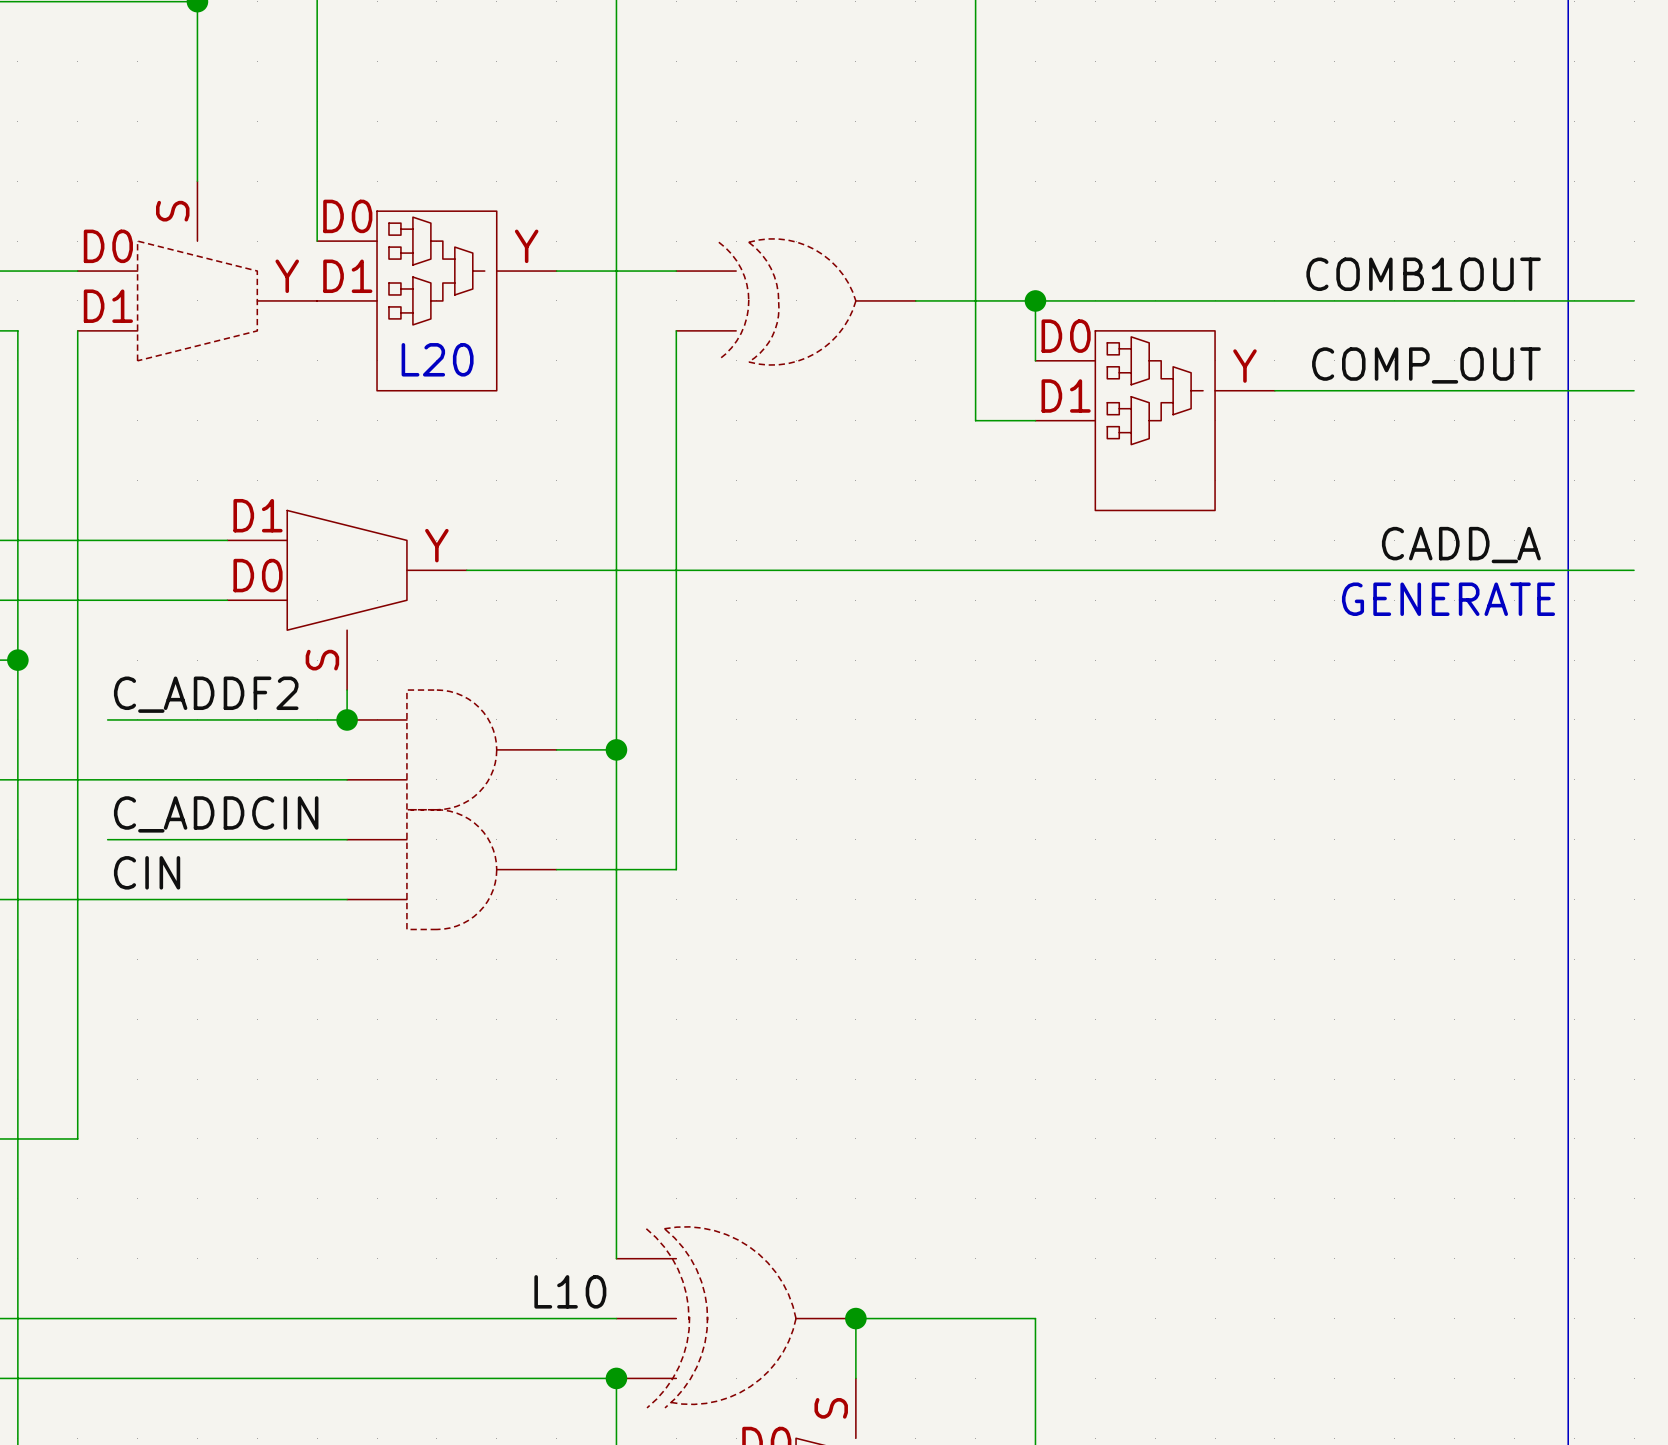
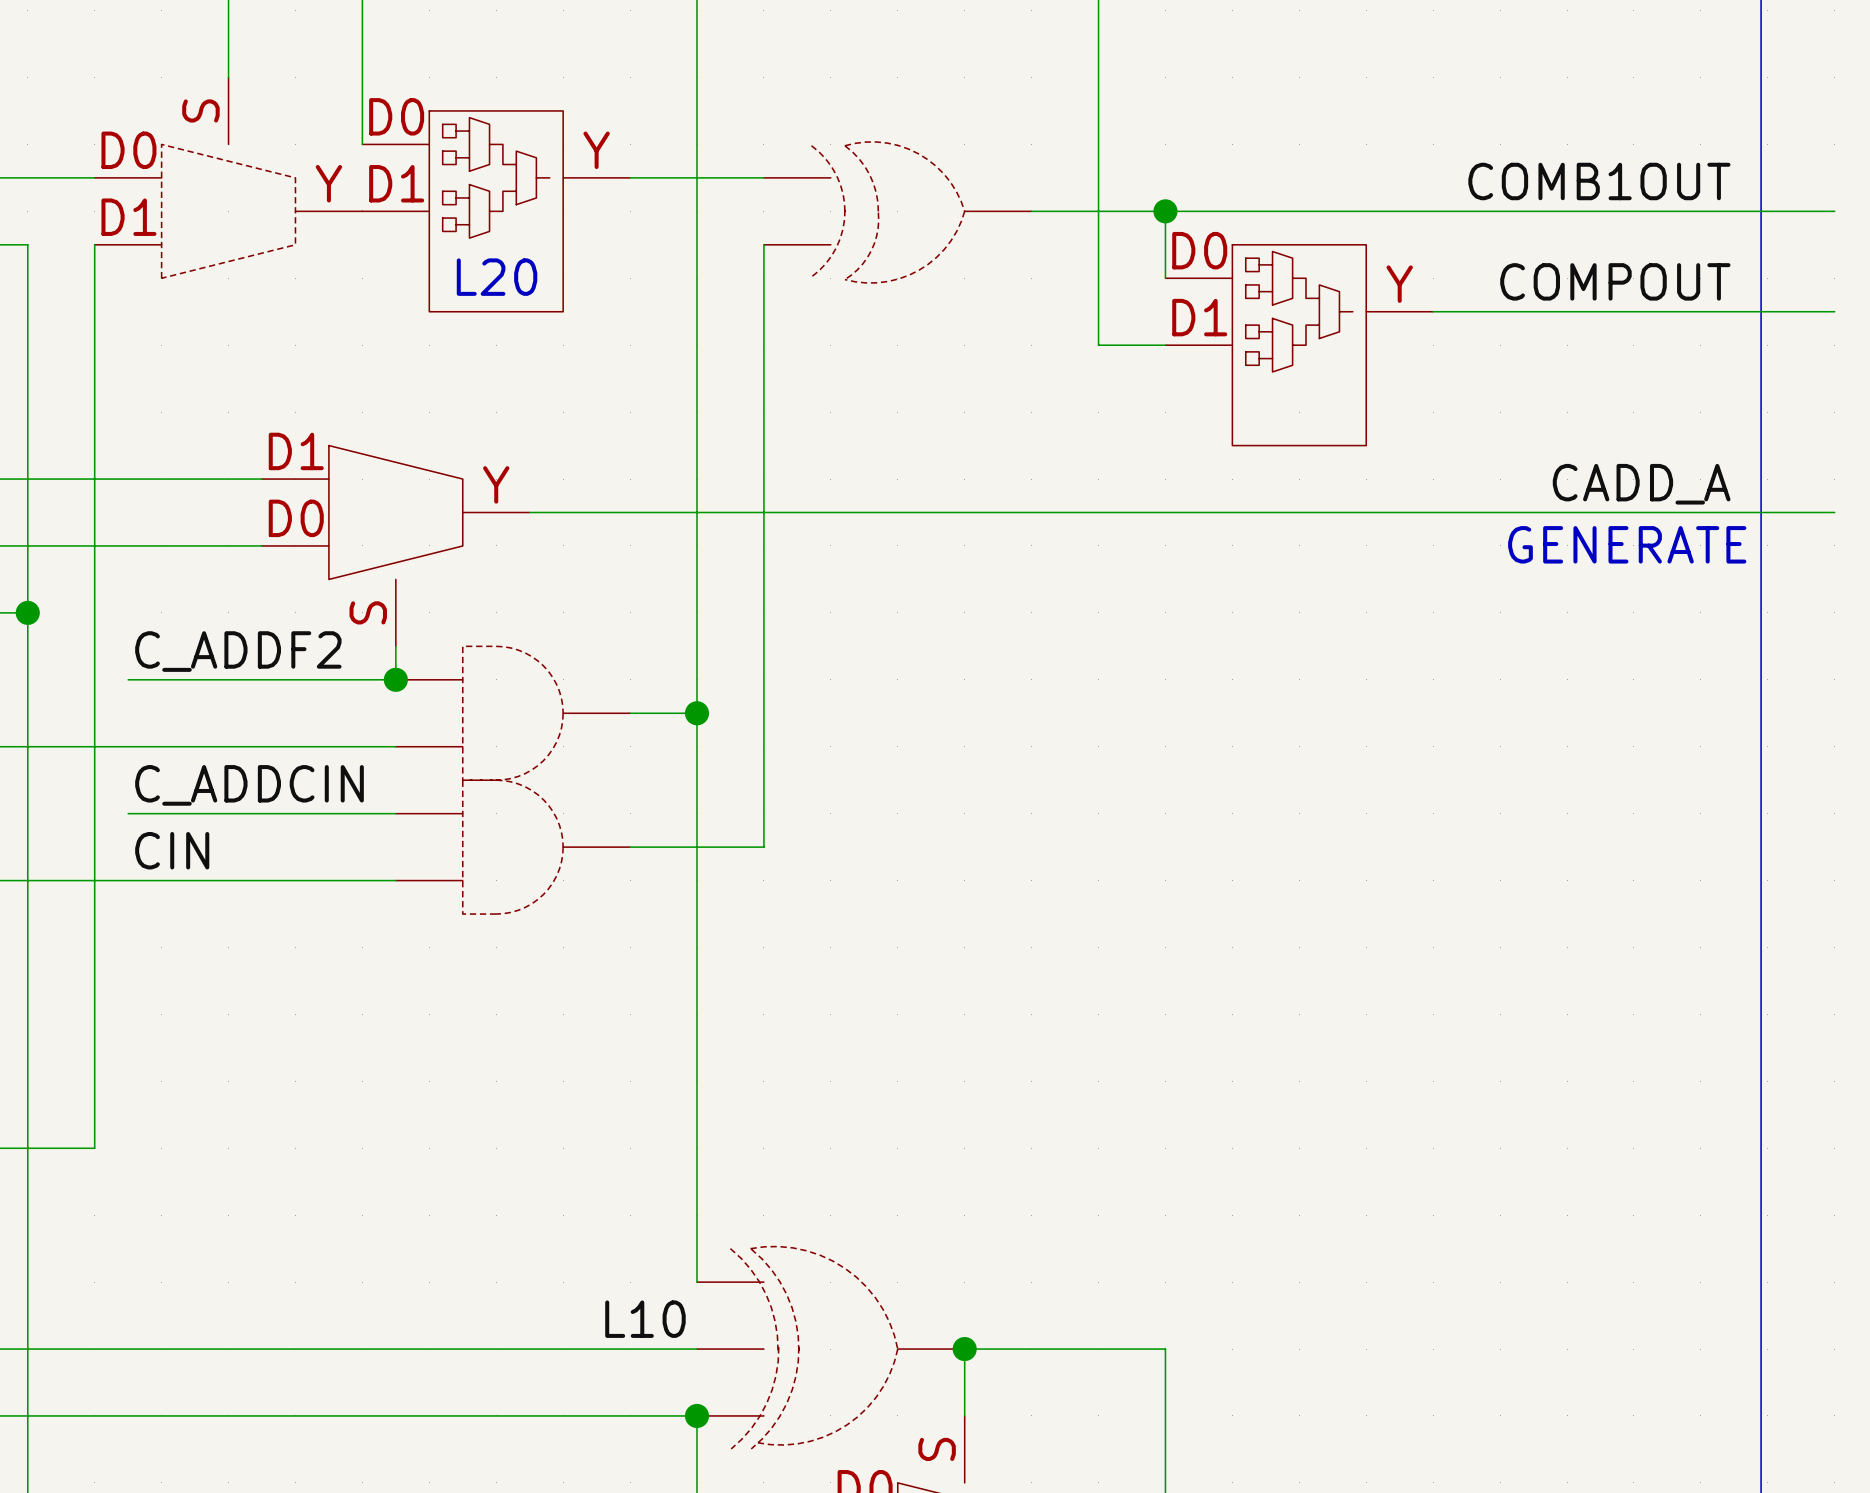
label: COMP_OUT (1426, 365) -> COMPOUT (1615, 281)

